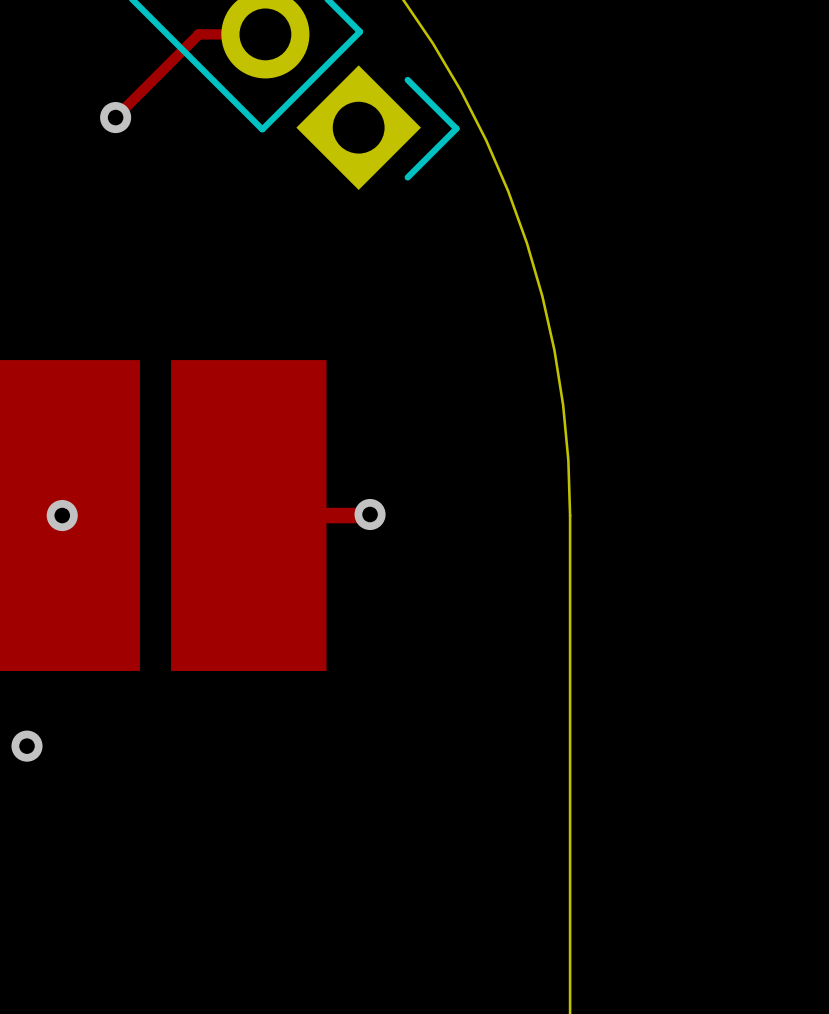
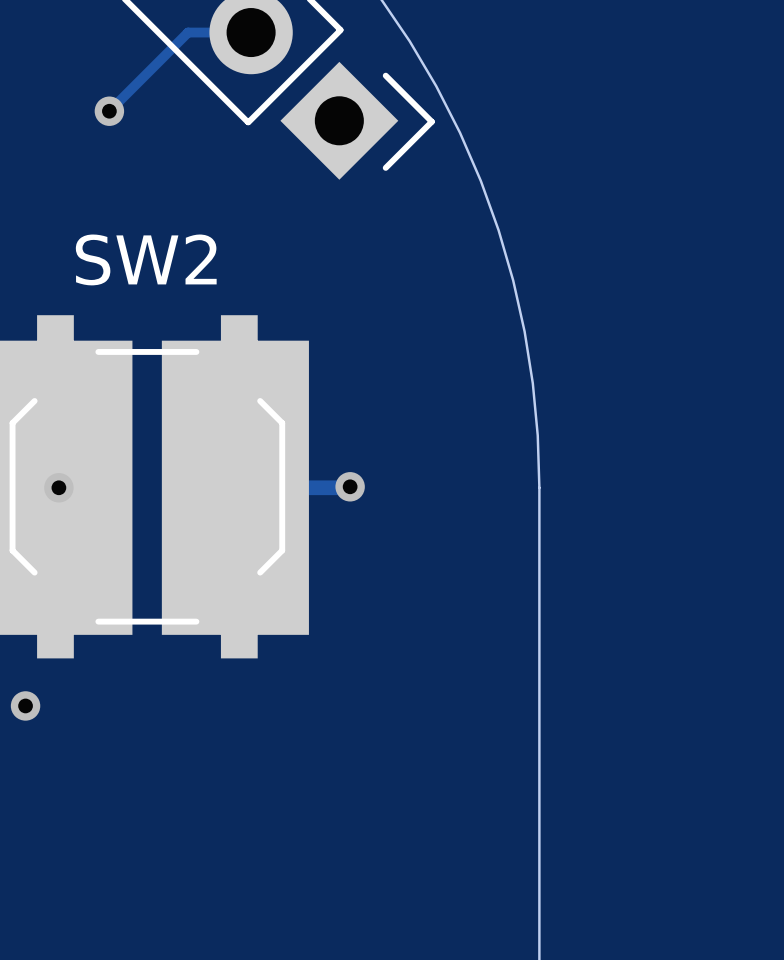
SW2: none -> (147, 486)

